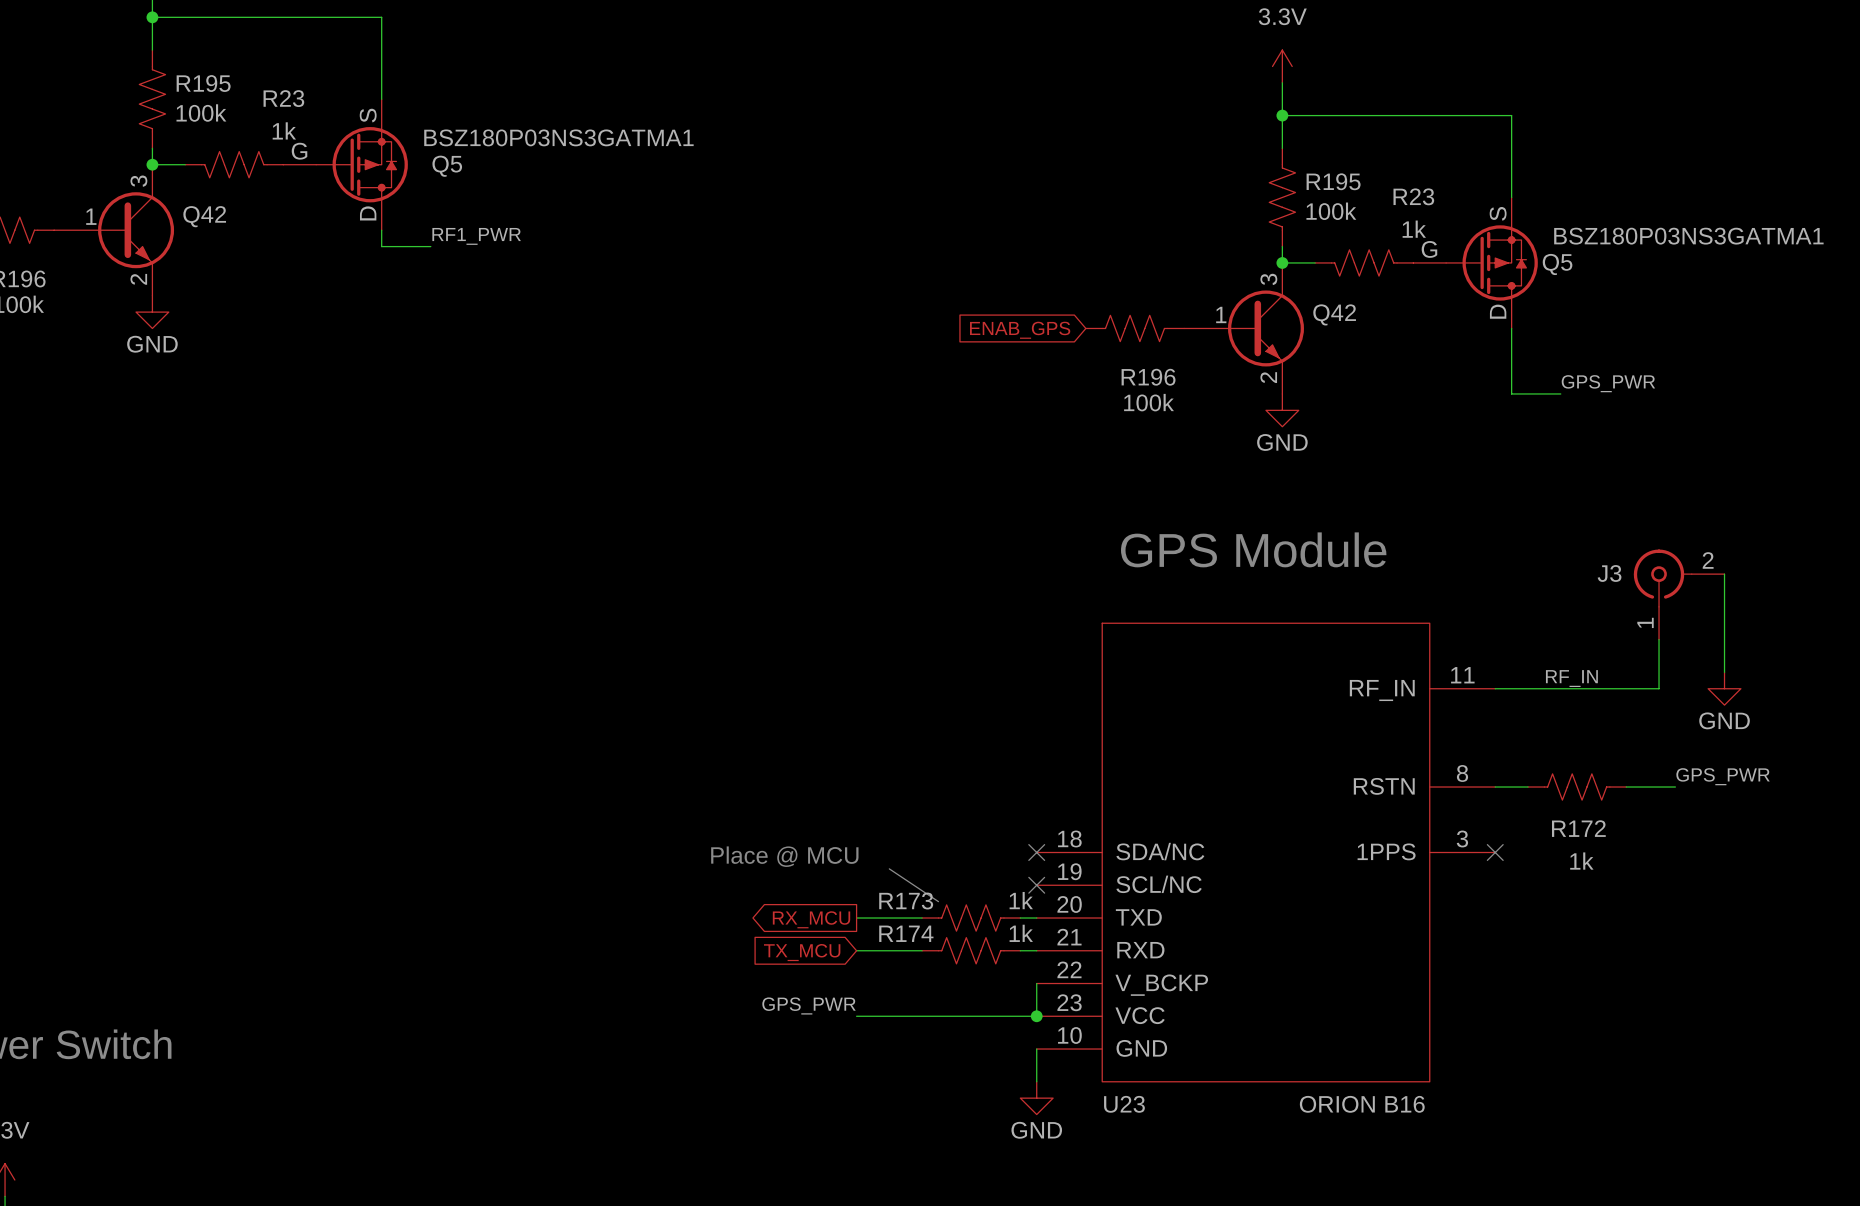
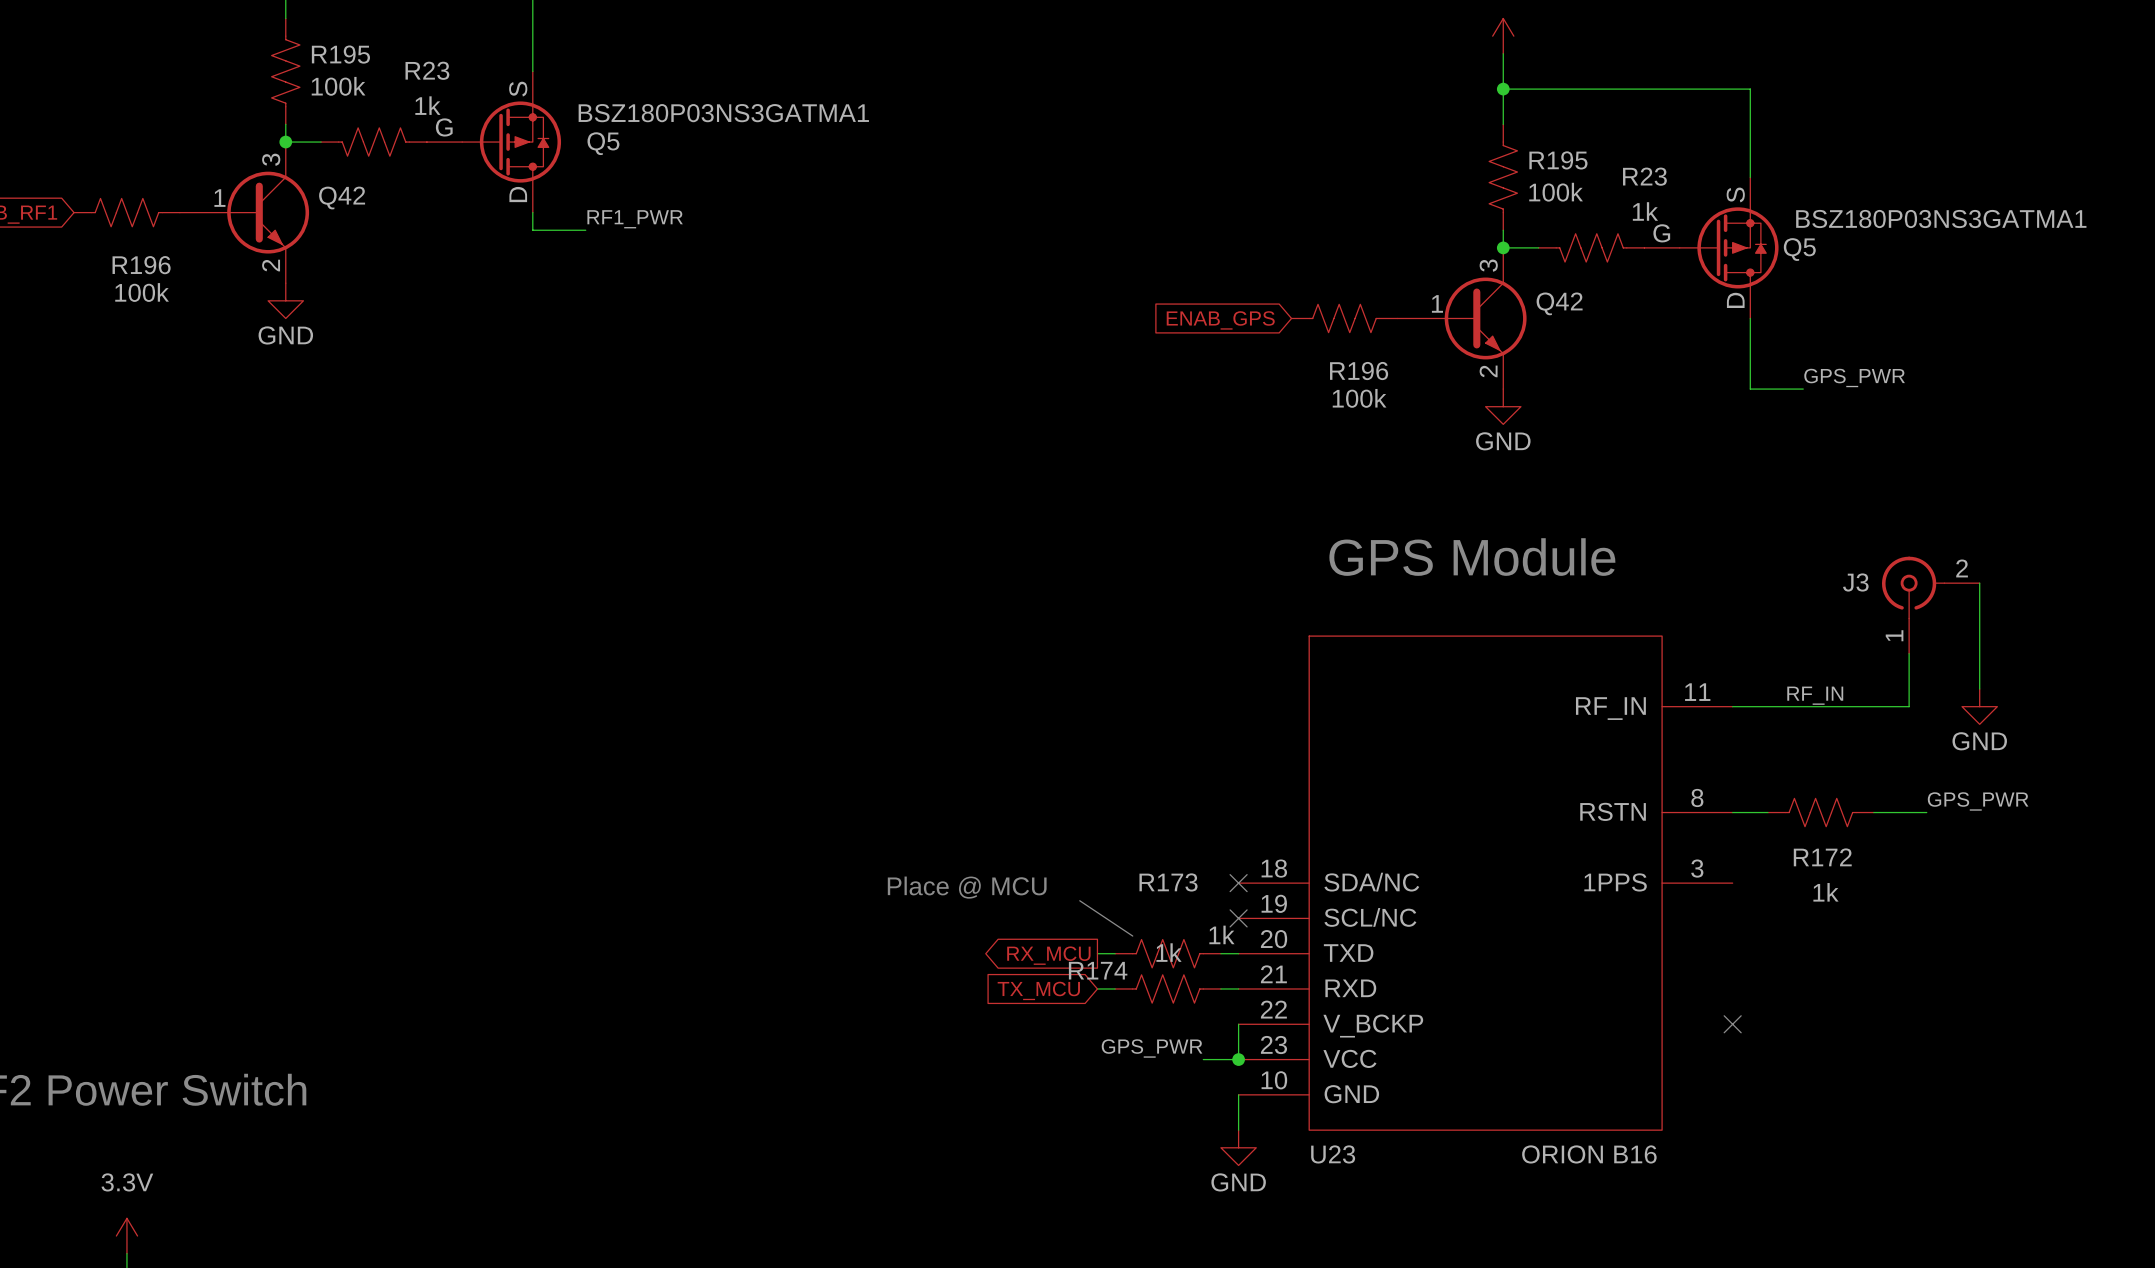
no-connect mark: (1495, 852) -> none
R173 name position: R173 (906, 901) -> R173 (1168, 882)
wire: (856, 918) (905, 918) -> none
global label position: RX_MCU (811, 919) -> RX_MCU (1048, 955)
R174 value position: 1k (1021, 933) -> 1k (1169, 952)
wire: (856, 950) (905, 950) -> none
global label position: TX_MCU (802, 952) -> TX_MCU (1038, 990)
no-connect mark: none -> (1732, 1024)
label position: GPS_PWR (809, 1005) -> GPS_PWR (1152, 1048)
wire: (856, 1016) (1003, 1016) -> none

